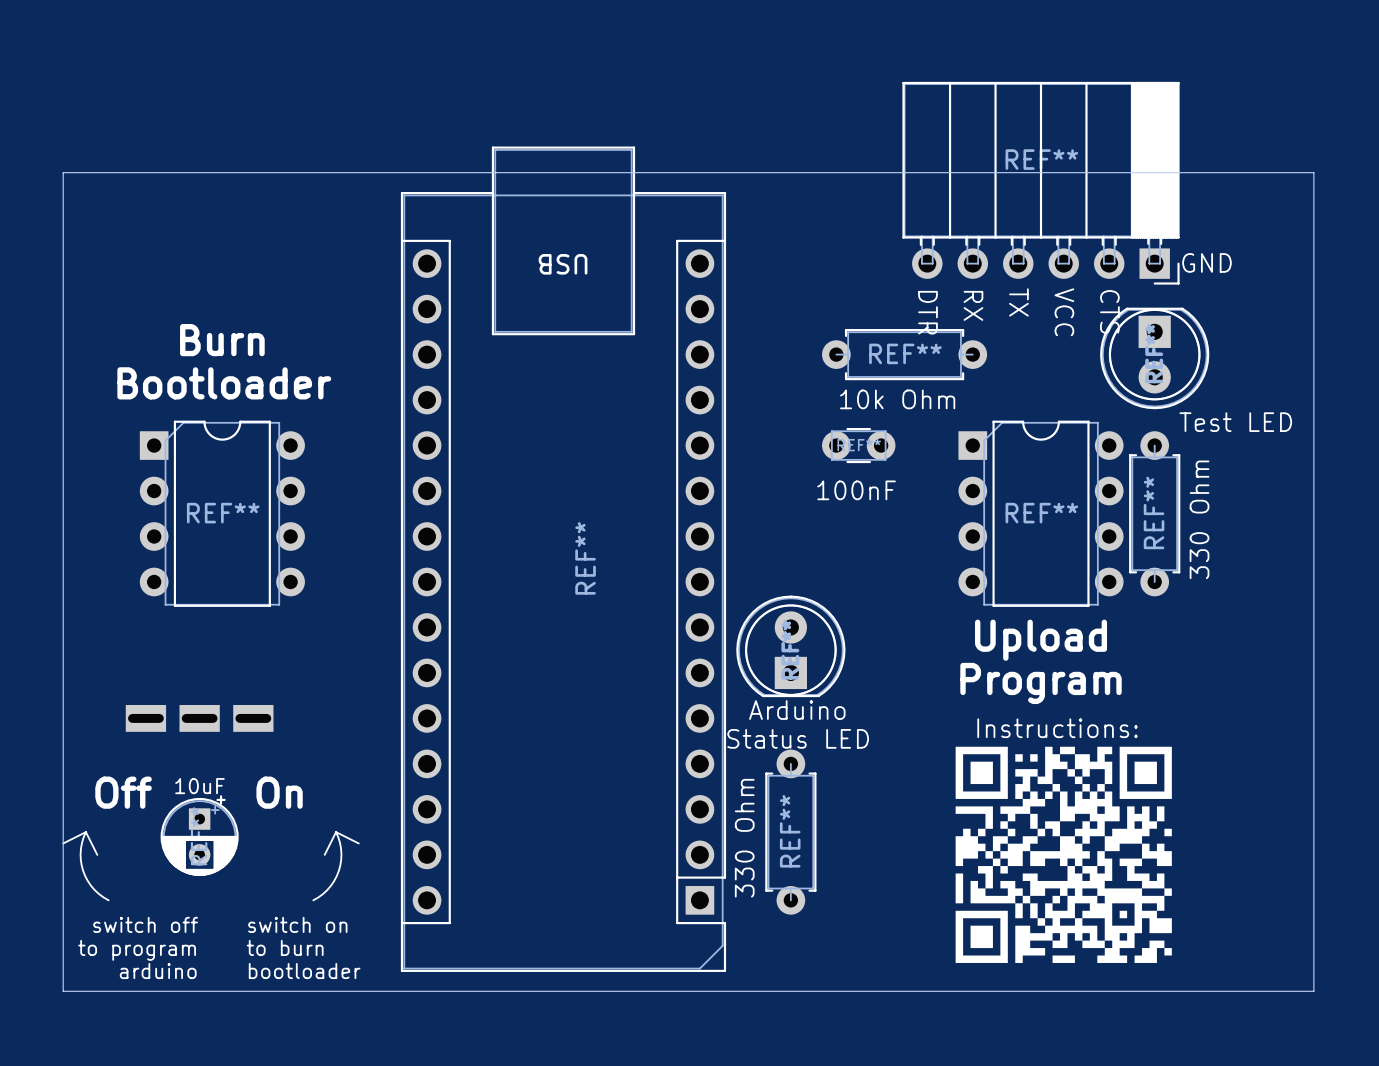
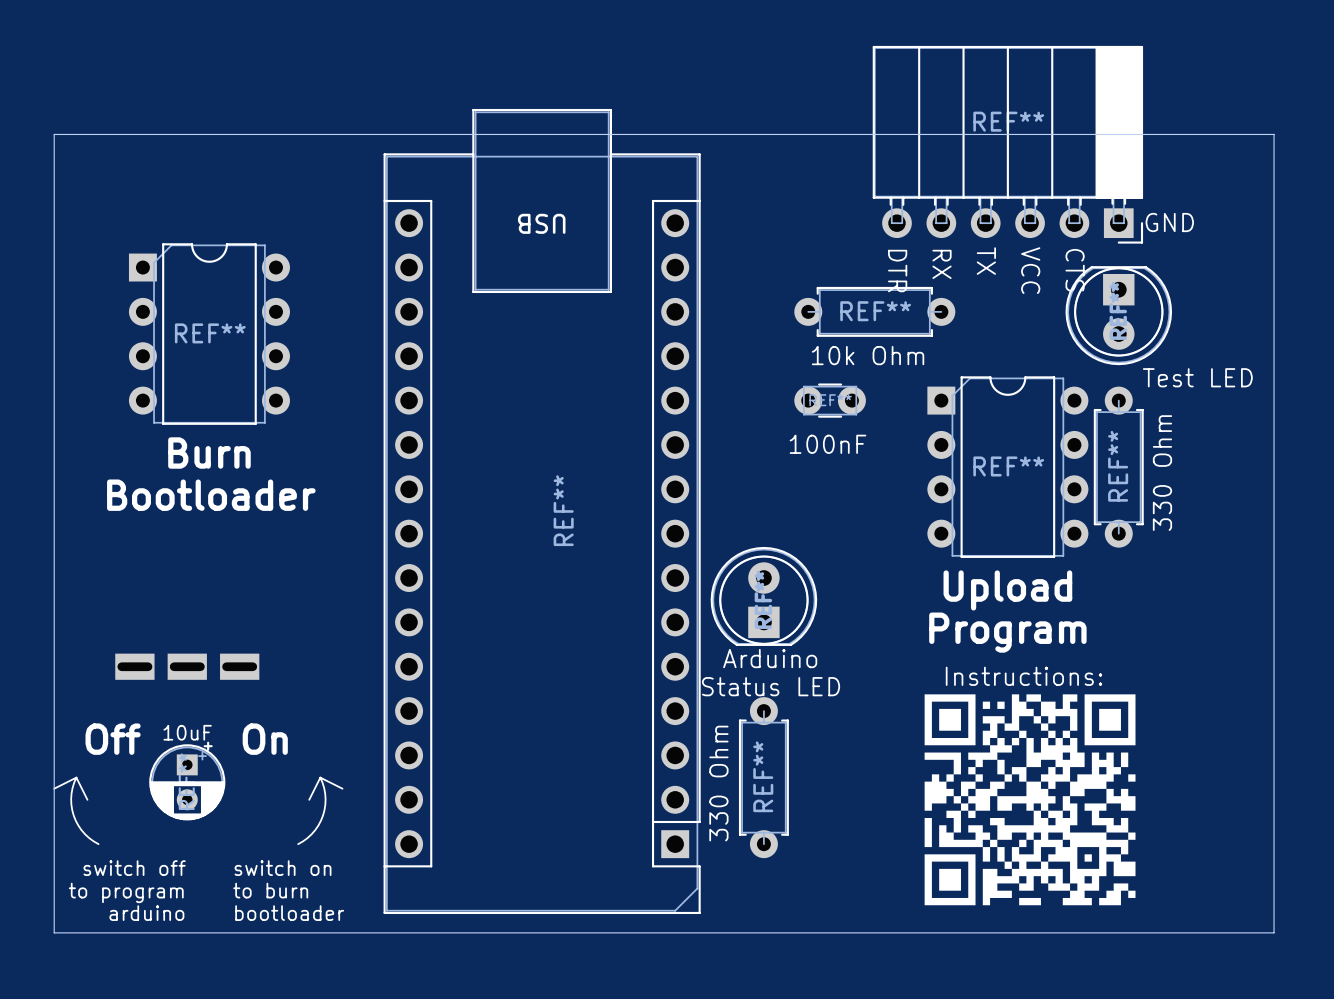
text position: Burn (222, 340) -> Burn (209, 453)
text position: Bootloader (224, 383) -> Bootloader (211, 495)
REF** position: (222, 513) -> (209, 334)

